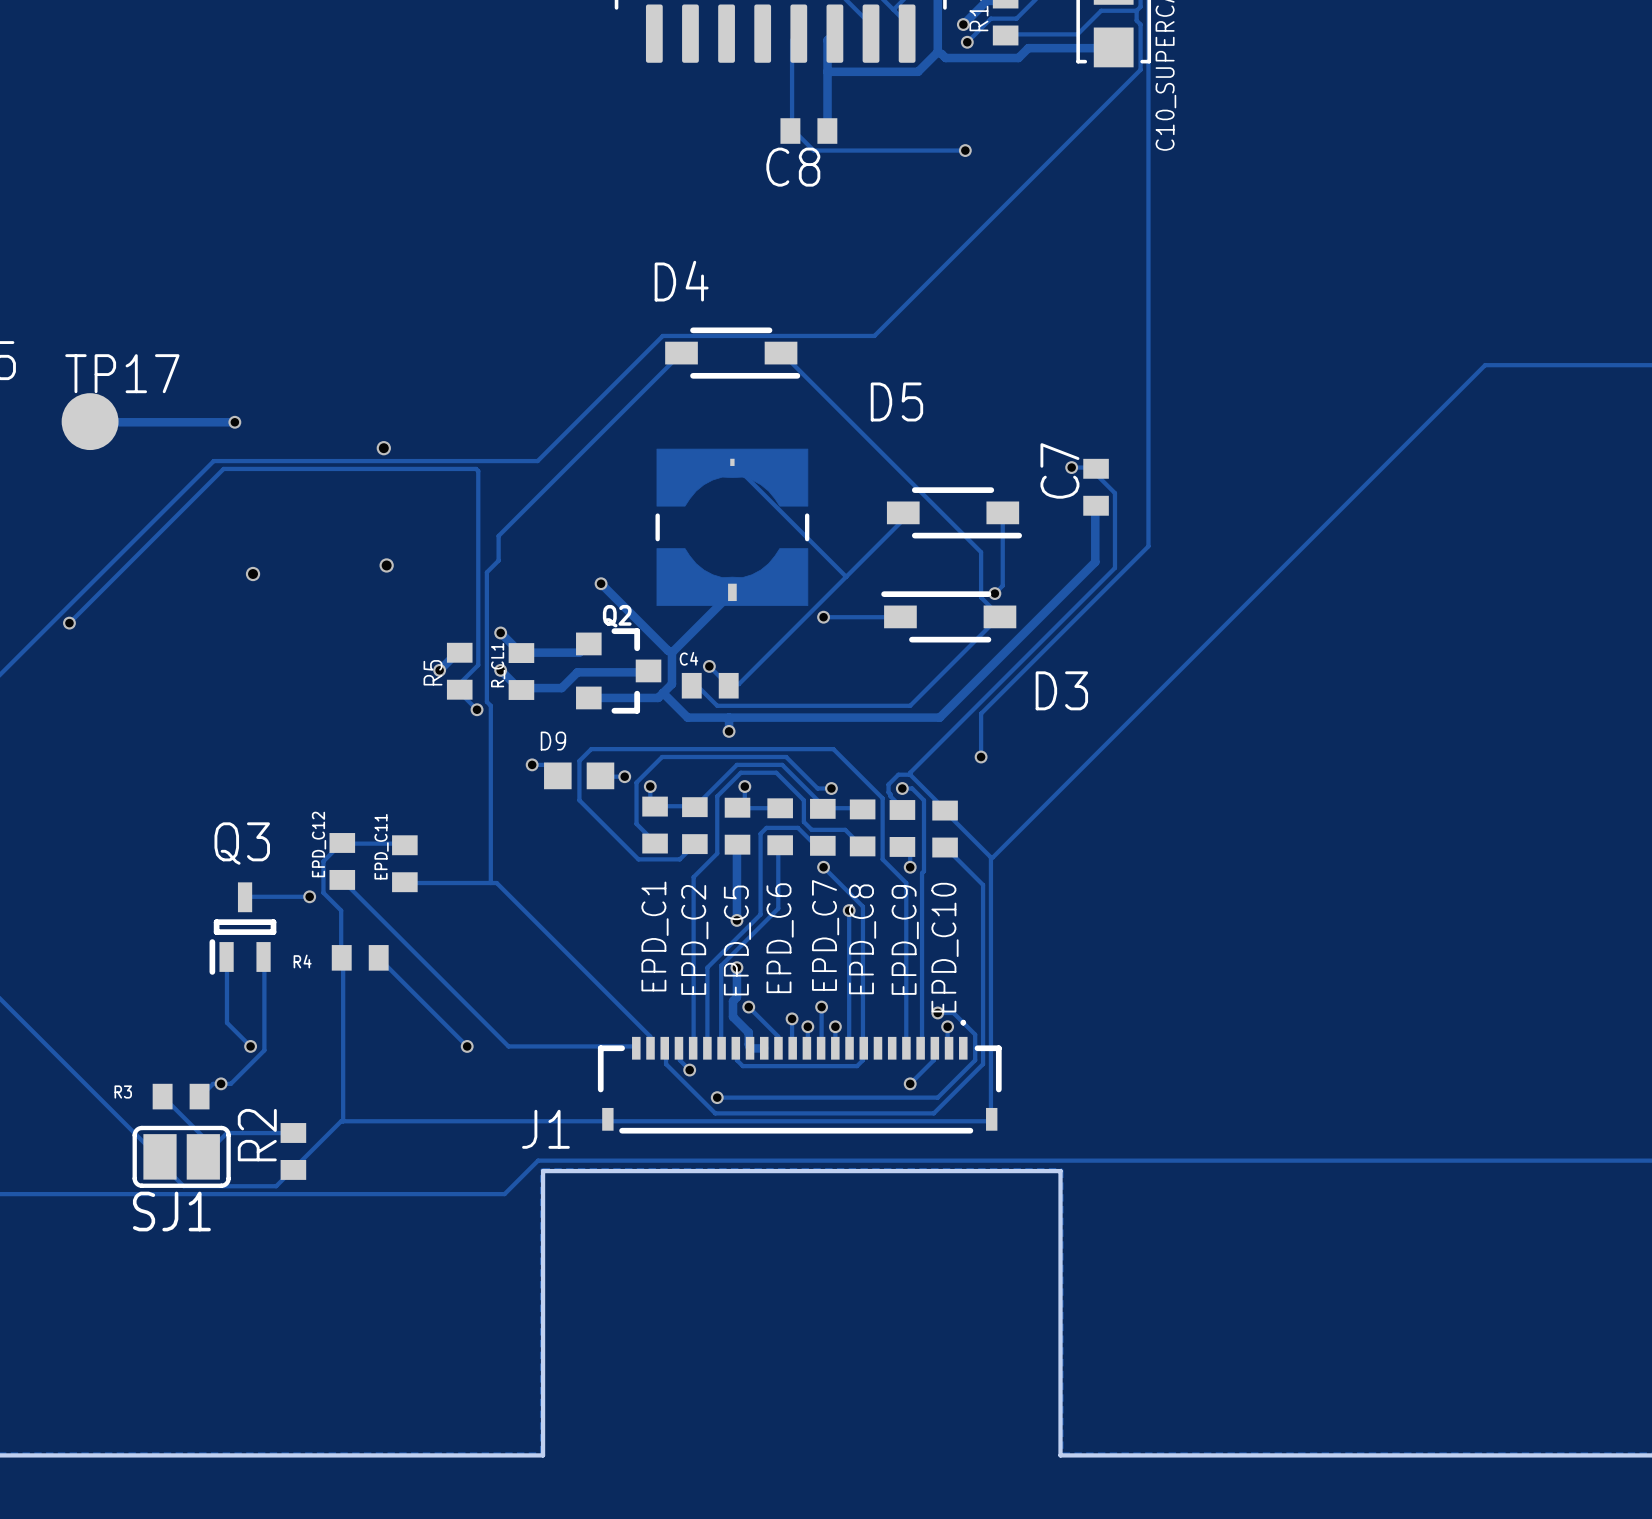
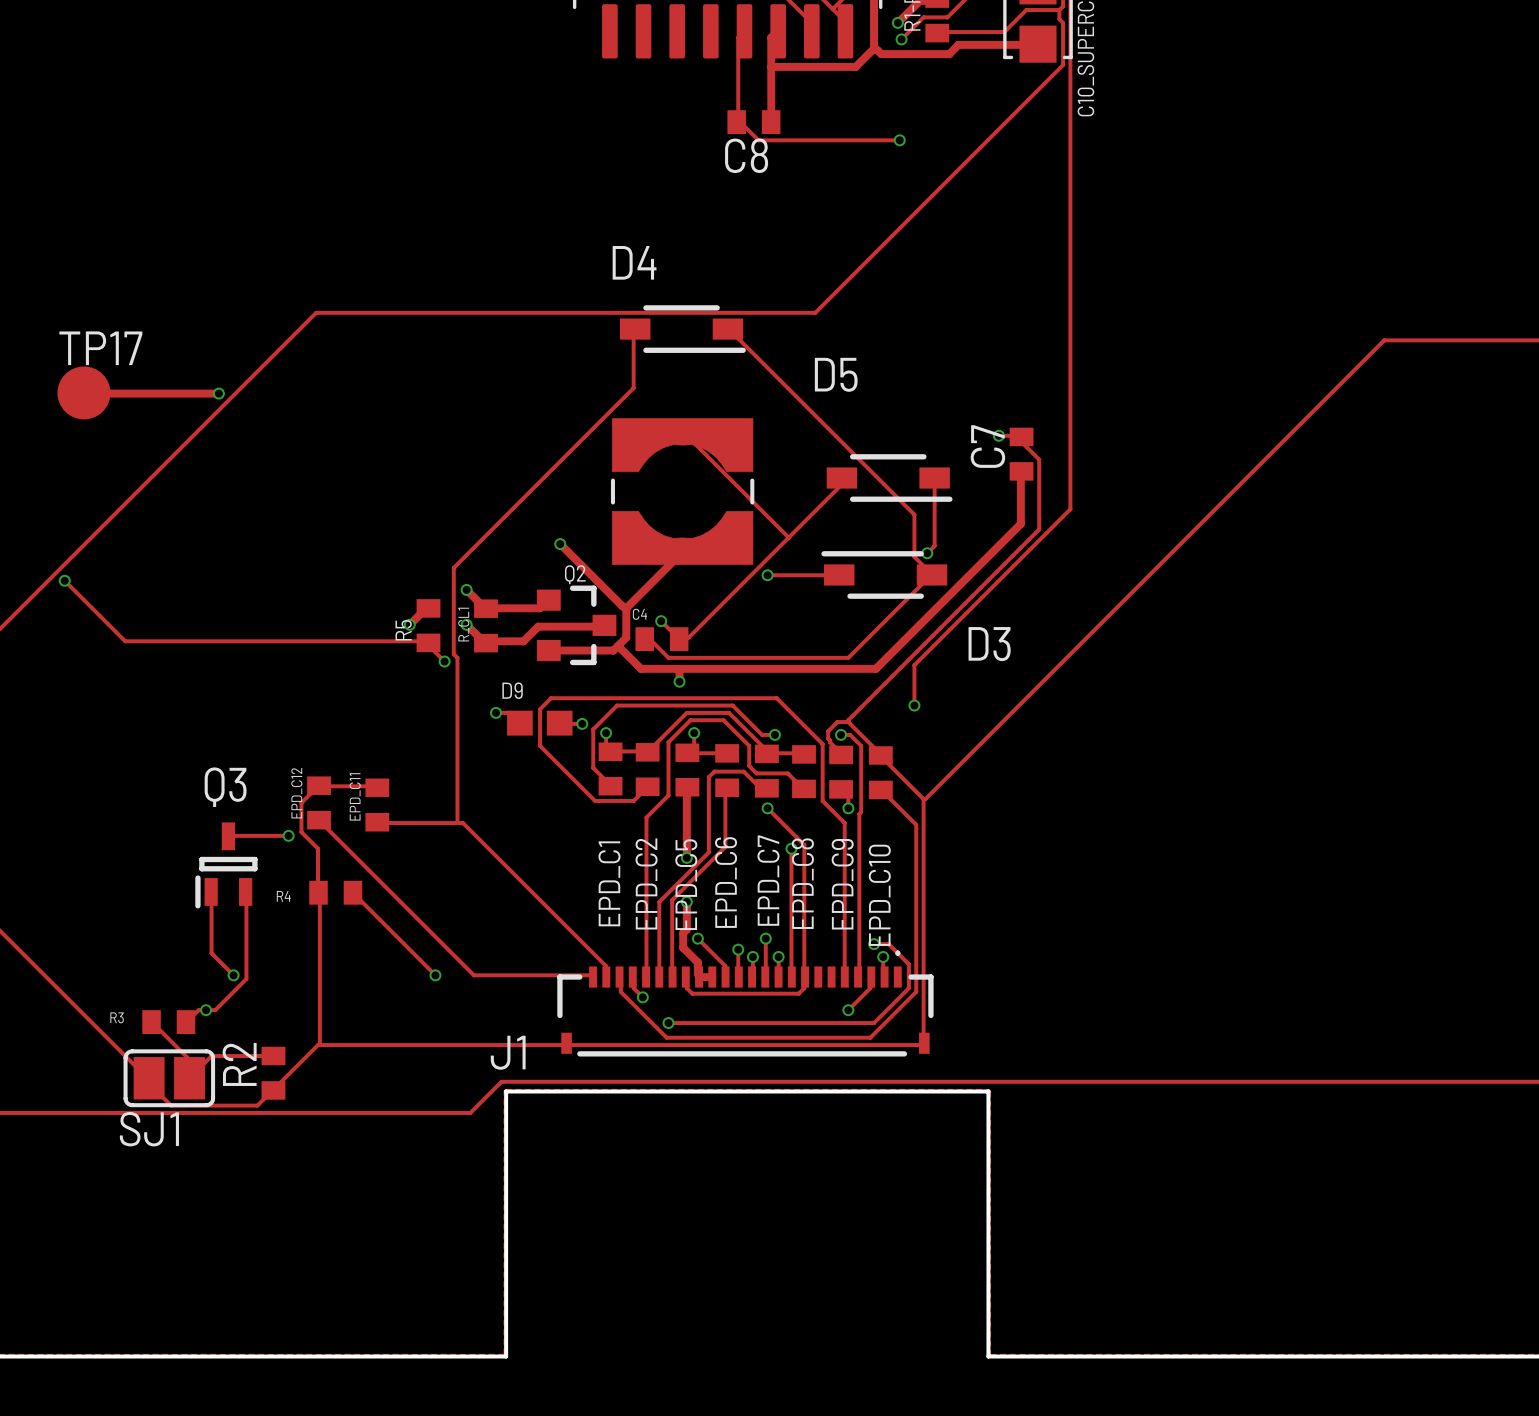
track: (874, 335) (662, 335) (537, 461) (213, 461) -> (815, 312) (316, 312) (199, 429)
track: (681, 353) (498, 535) (498, 560) (486, 572) (486, 609) -> (635, 329) (633, 329) (633, 388) (453, 567)
via: (383, 448) -> none
via: (386, 565) -> none
via: (253, 574) -> none
track: (69, 623) (223, 468) (476, 468) (478, 471) (478, 665) (459, 683) (459, 689) -> (64, 580) (125, 641) (428, 641) (428, 642)

